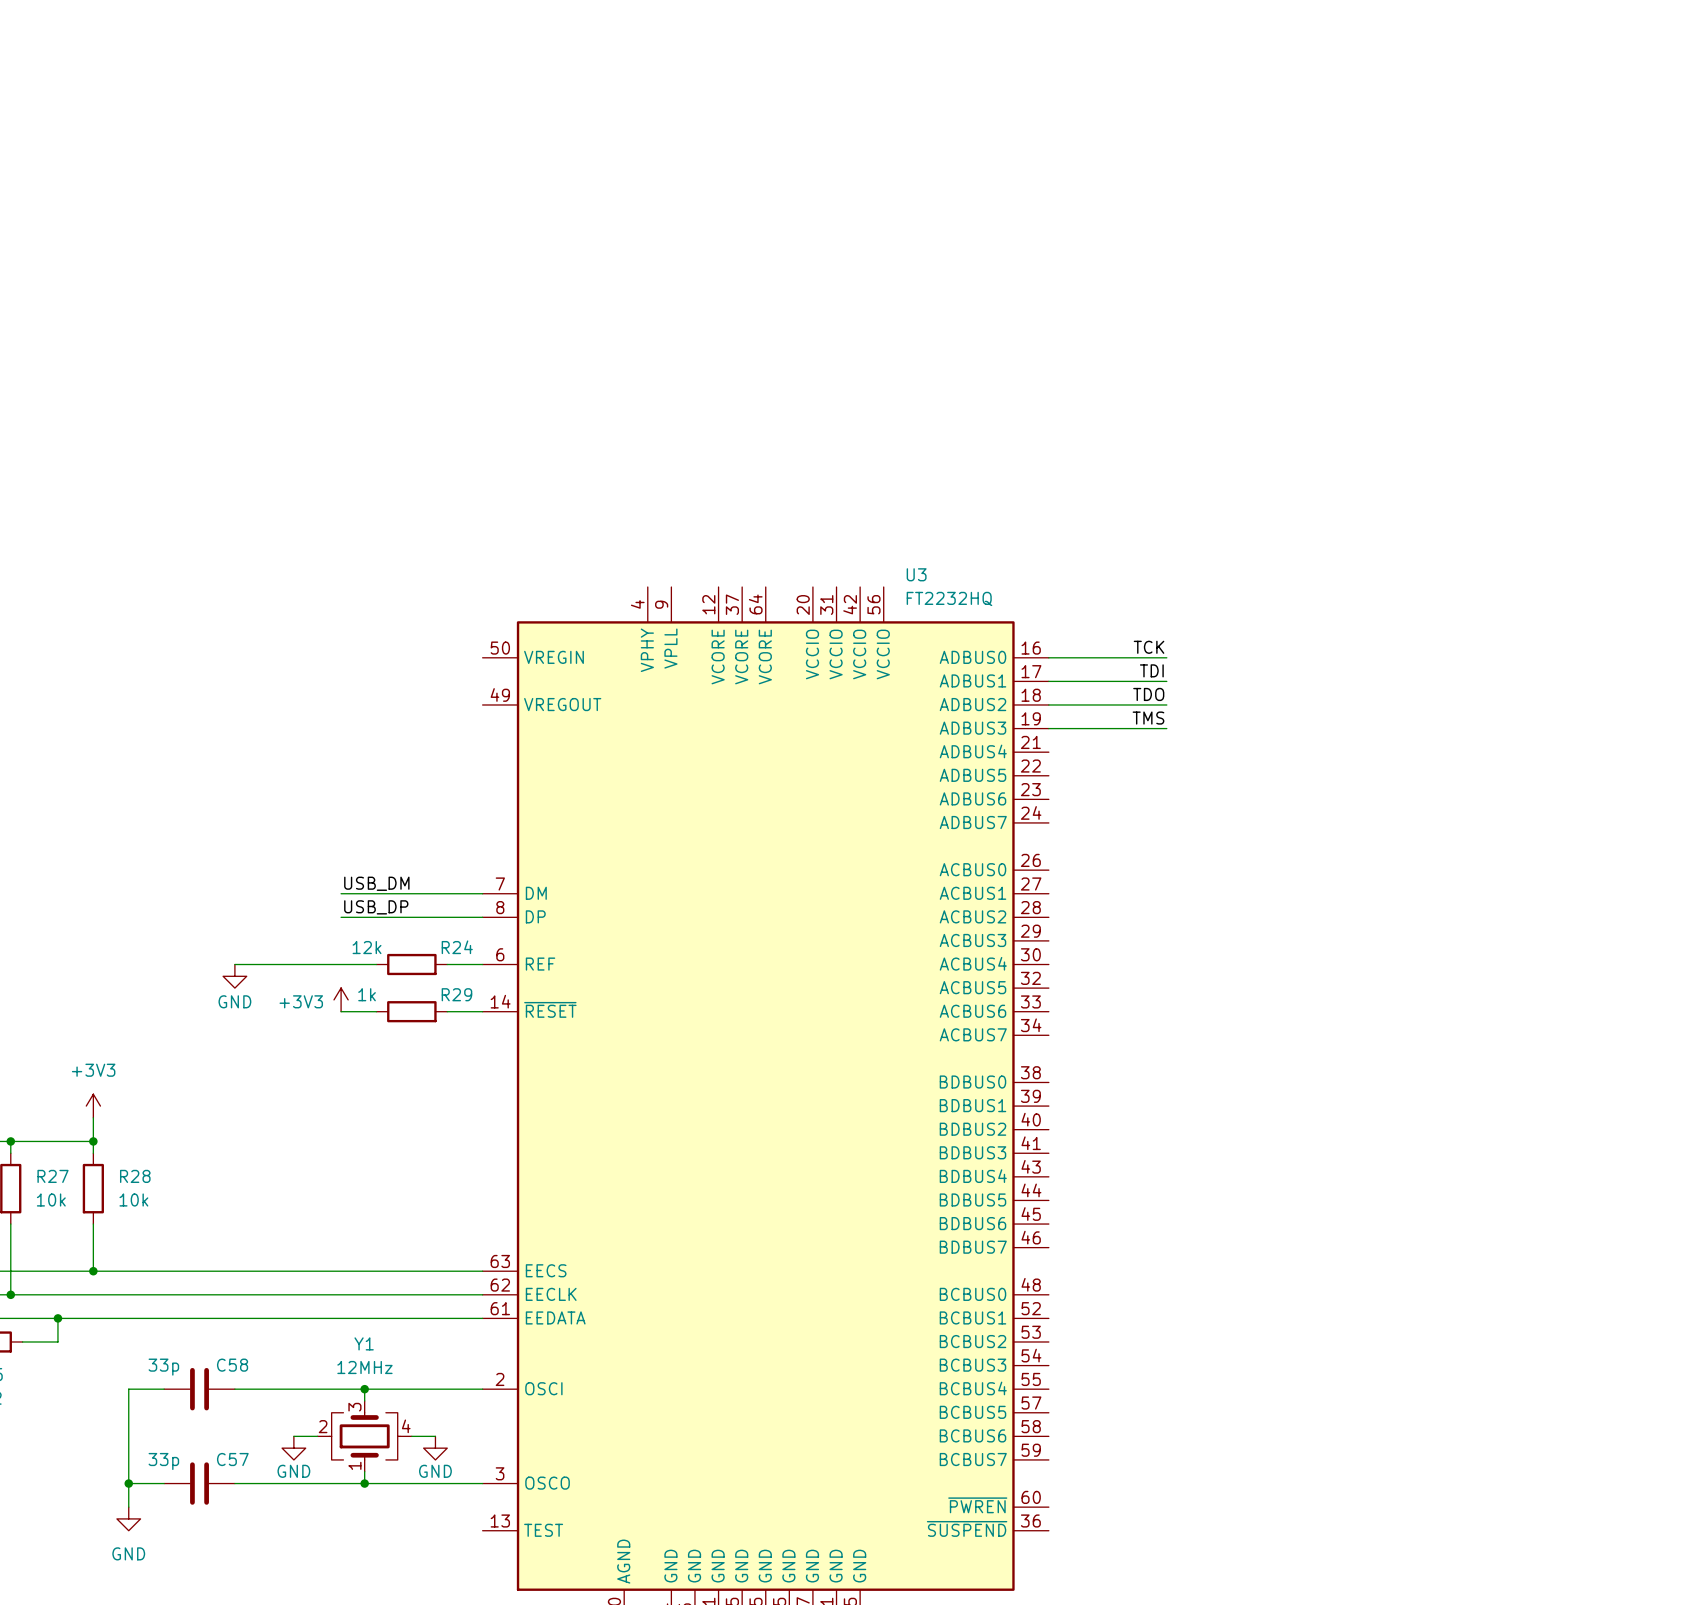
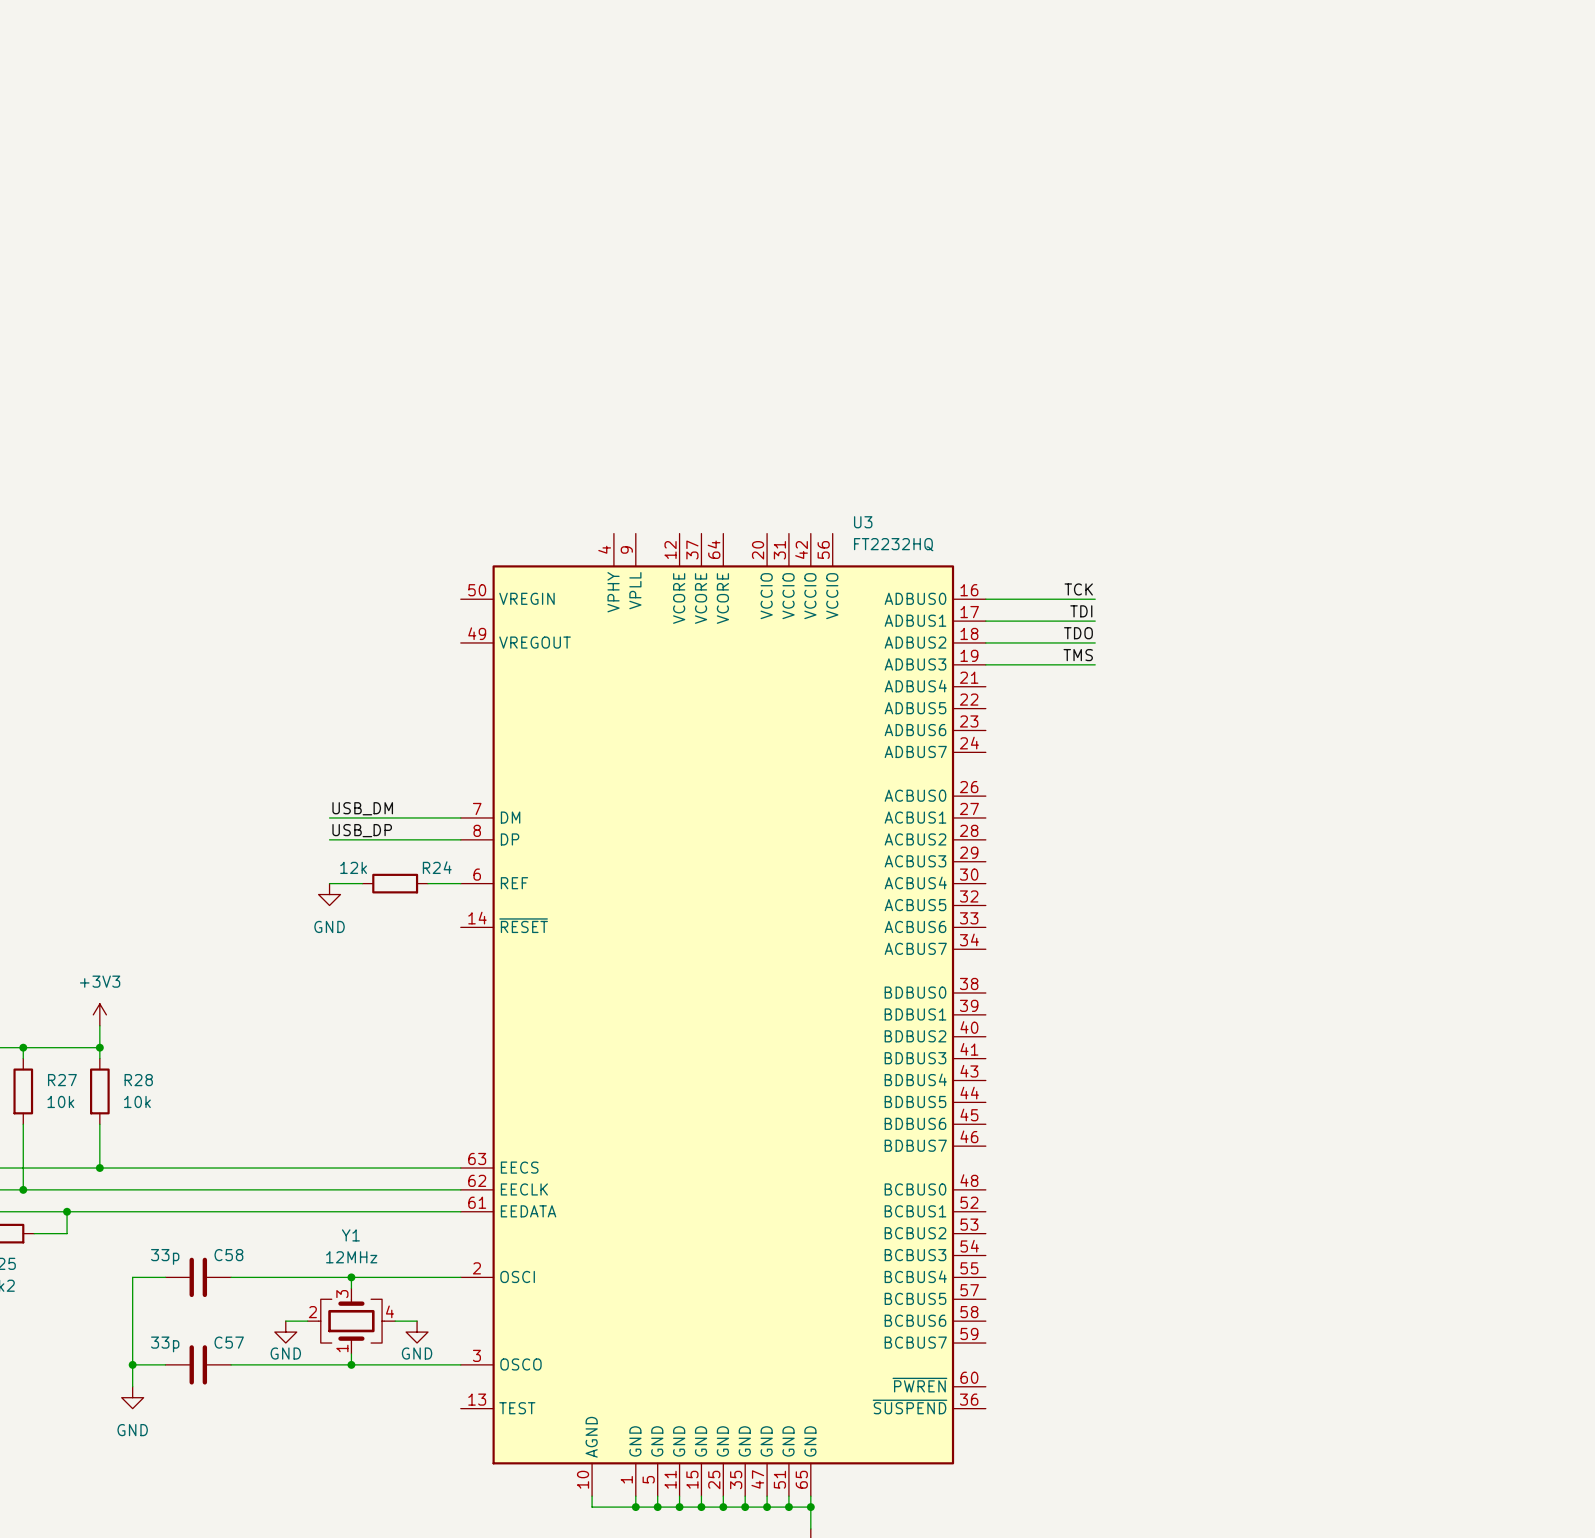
wire: (234, 964) (341, 964) -> none
power symbol position: GND (234, 976) -> GND (329, 894)
power symbol: +3V3 (341, 999) -> none
power symbol text position: GND (234, 1001) -> GND (329, 926)
wire: (341, 1011) (376, 1011) -> none
R29: 1k (411, 1011) -> none
wire: (447, 1011) (482, 1011) -> none

